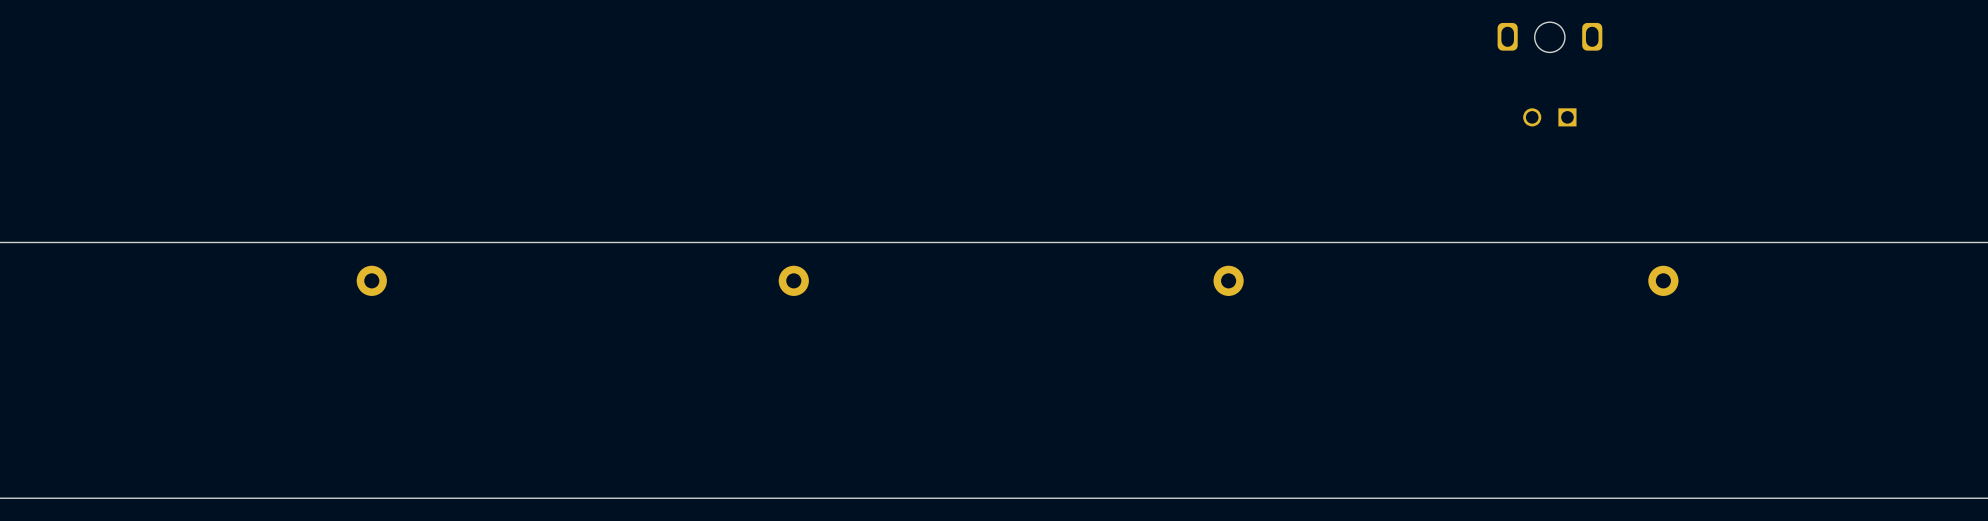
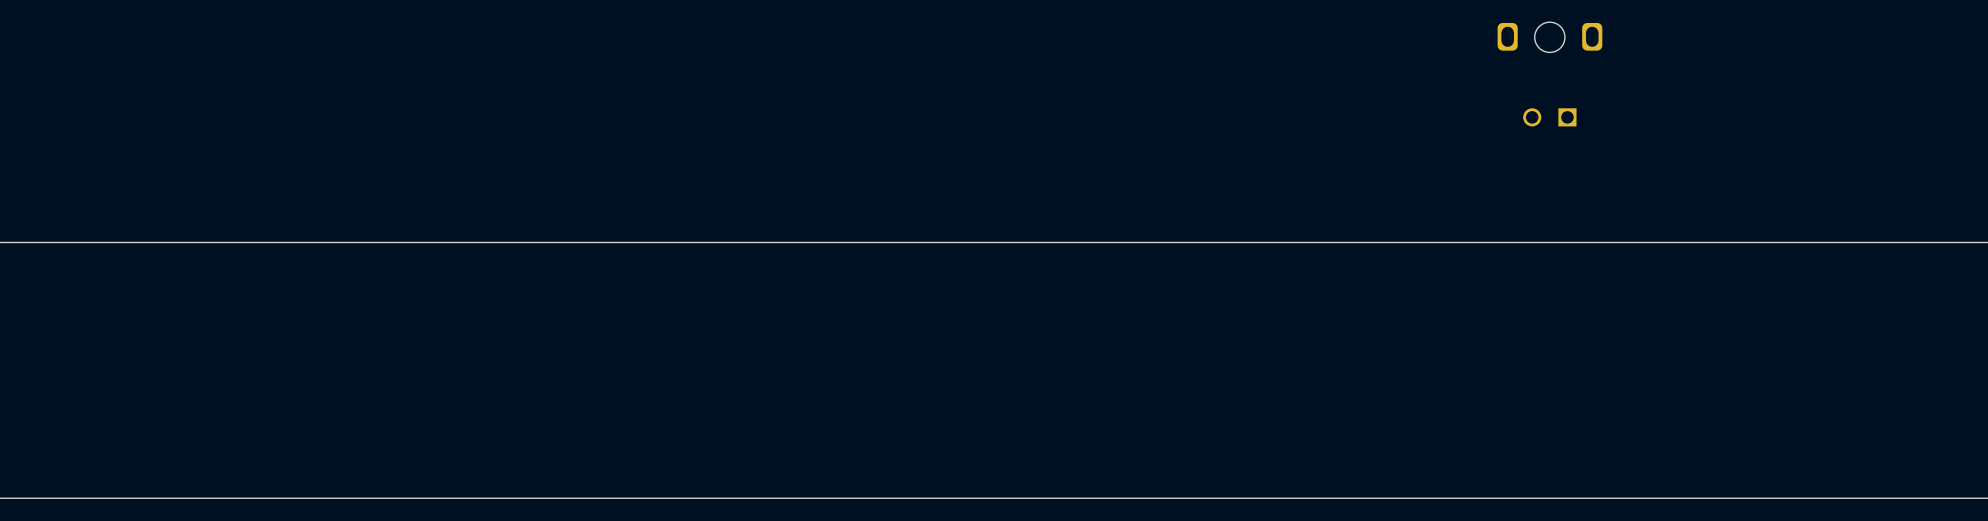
part: (371, 280) -> none
part: (793, 280) -> none
part: (1228, 280) -> none
part: (1663, 280) -> none

